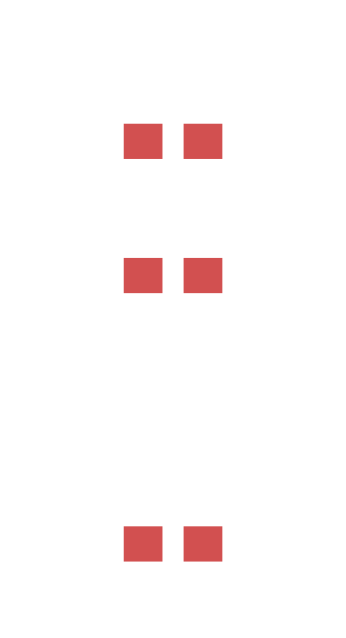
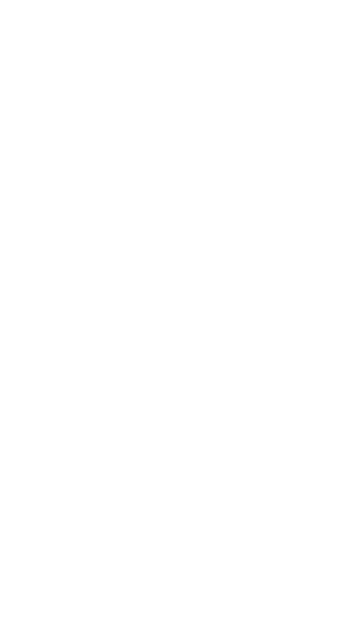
part: (173, 141) -> none
part: (173, 275) -> none
part: (173, 543) -> none

